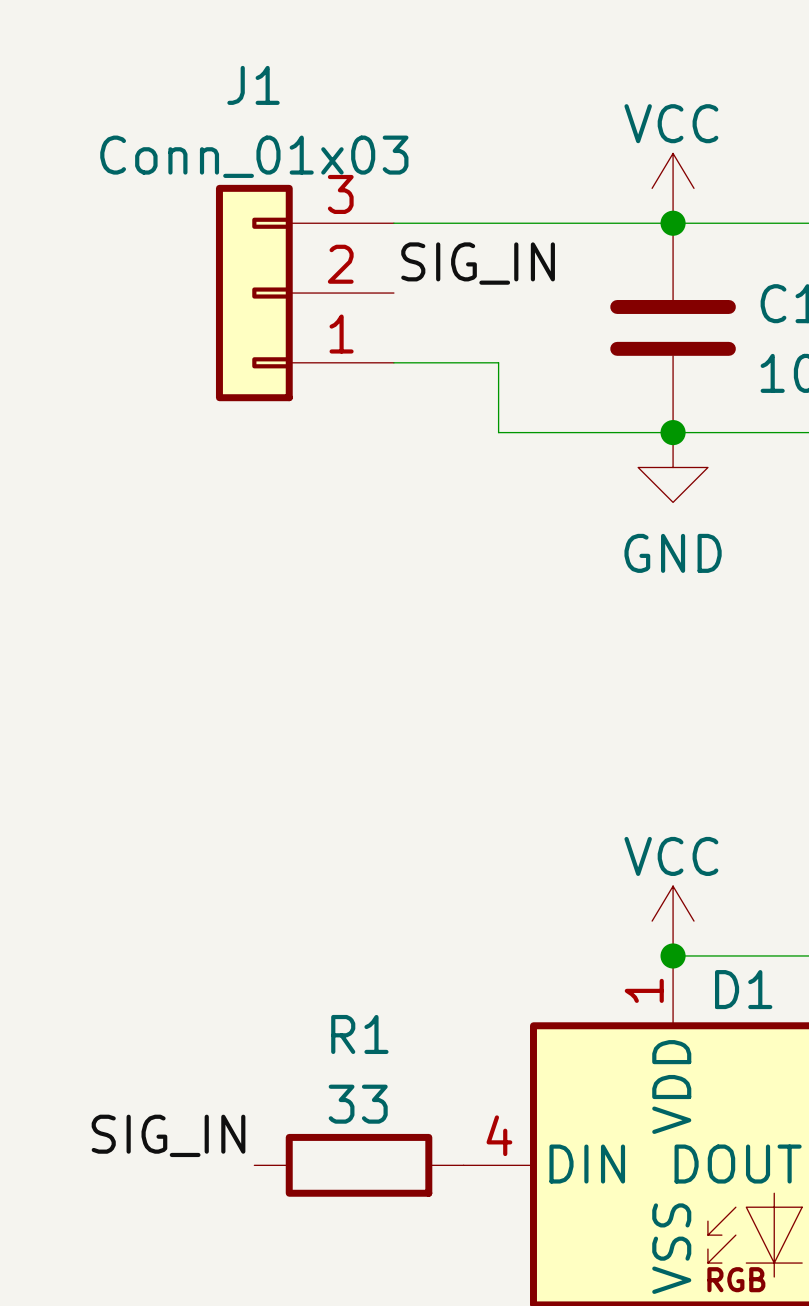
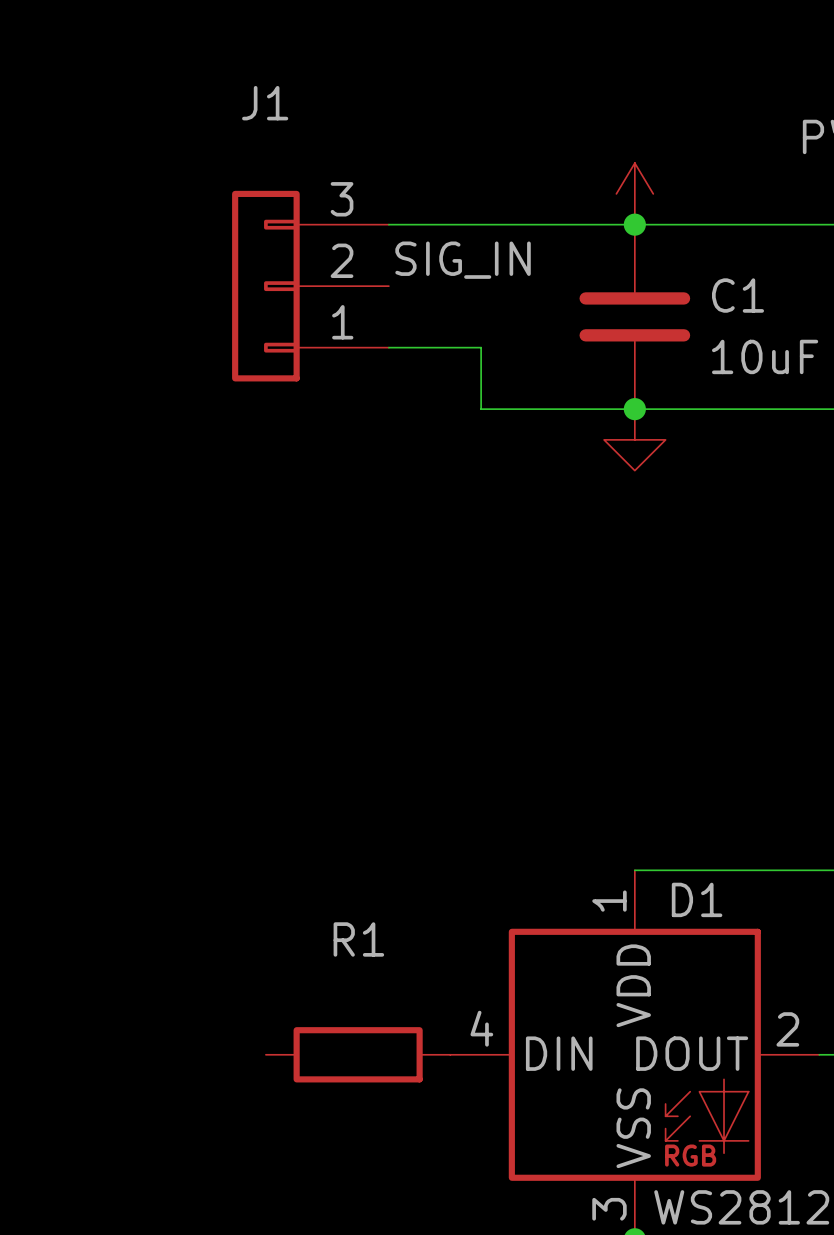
power symbol text: VCC (671, 123) -> none
J1 value: Conn_01x03 (254, 156) -> none
power symbol text: GND (673, 553) -> none
power symbol: VCC (673, 921) -> none
junction: (673, 955) -> none
R1 value: 33 (358, 1104) -> none
label: SIG_IN (168, 1135) -> none

